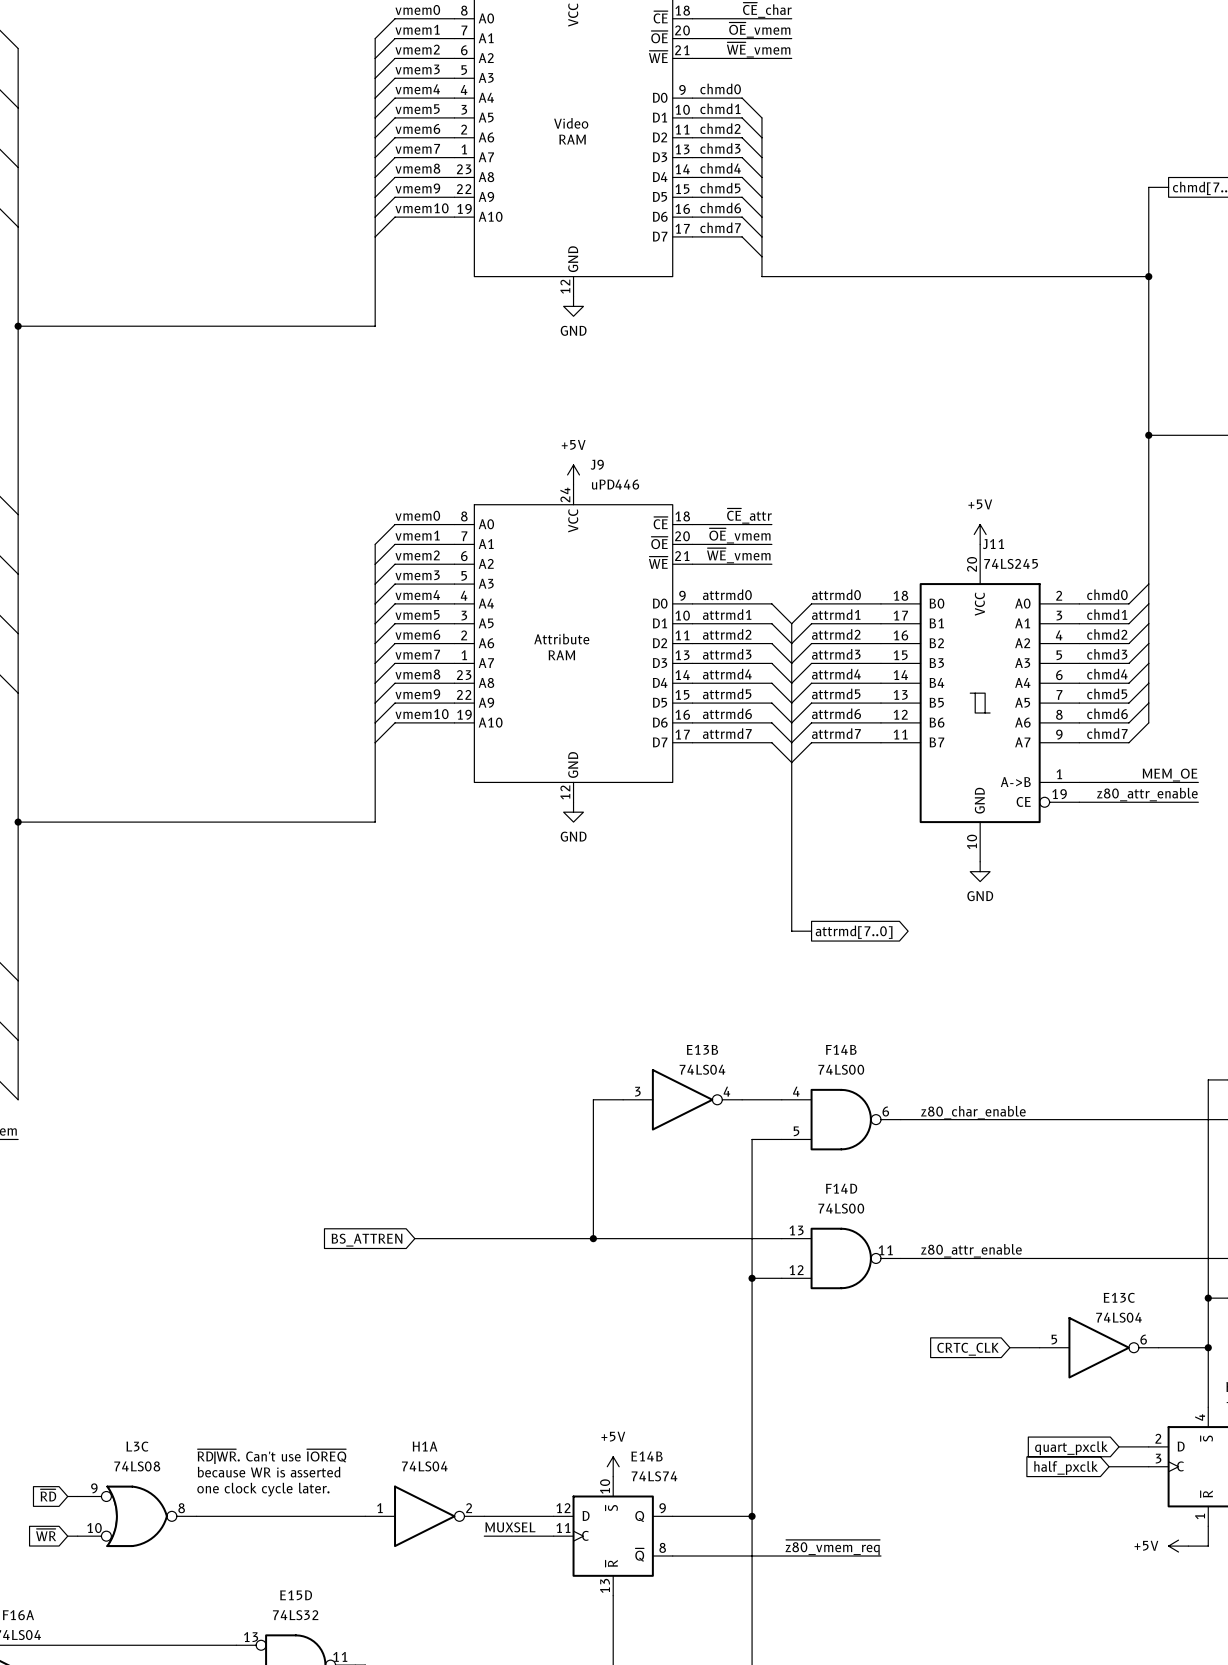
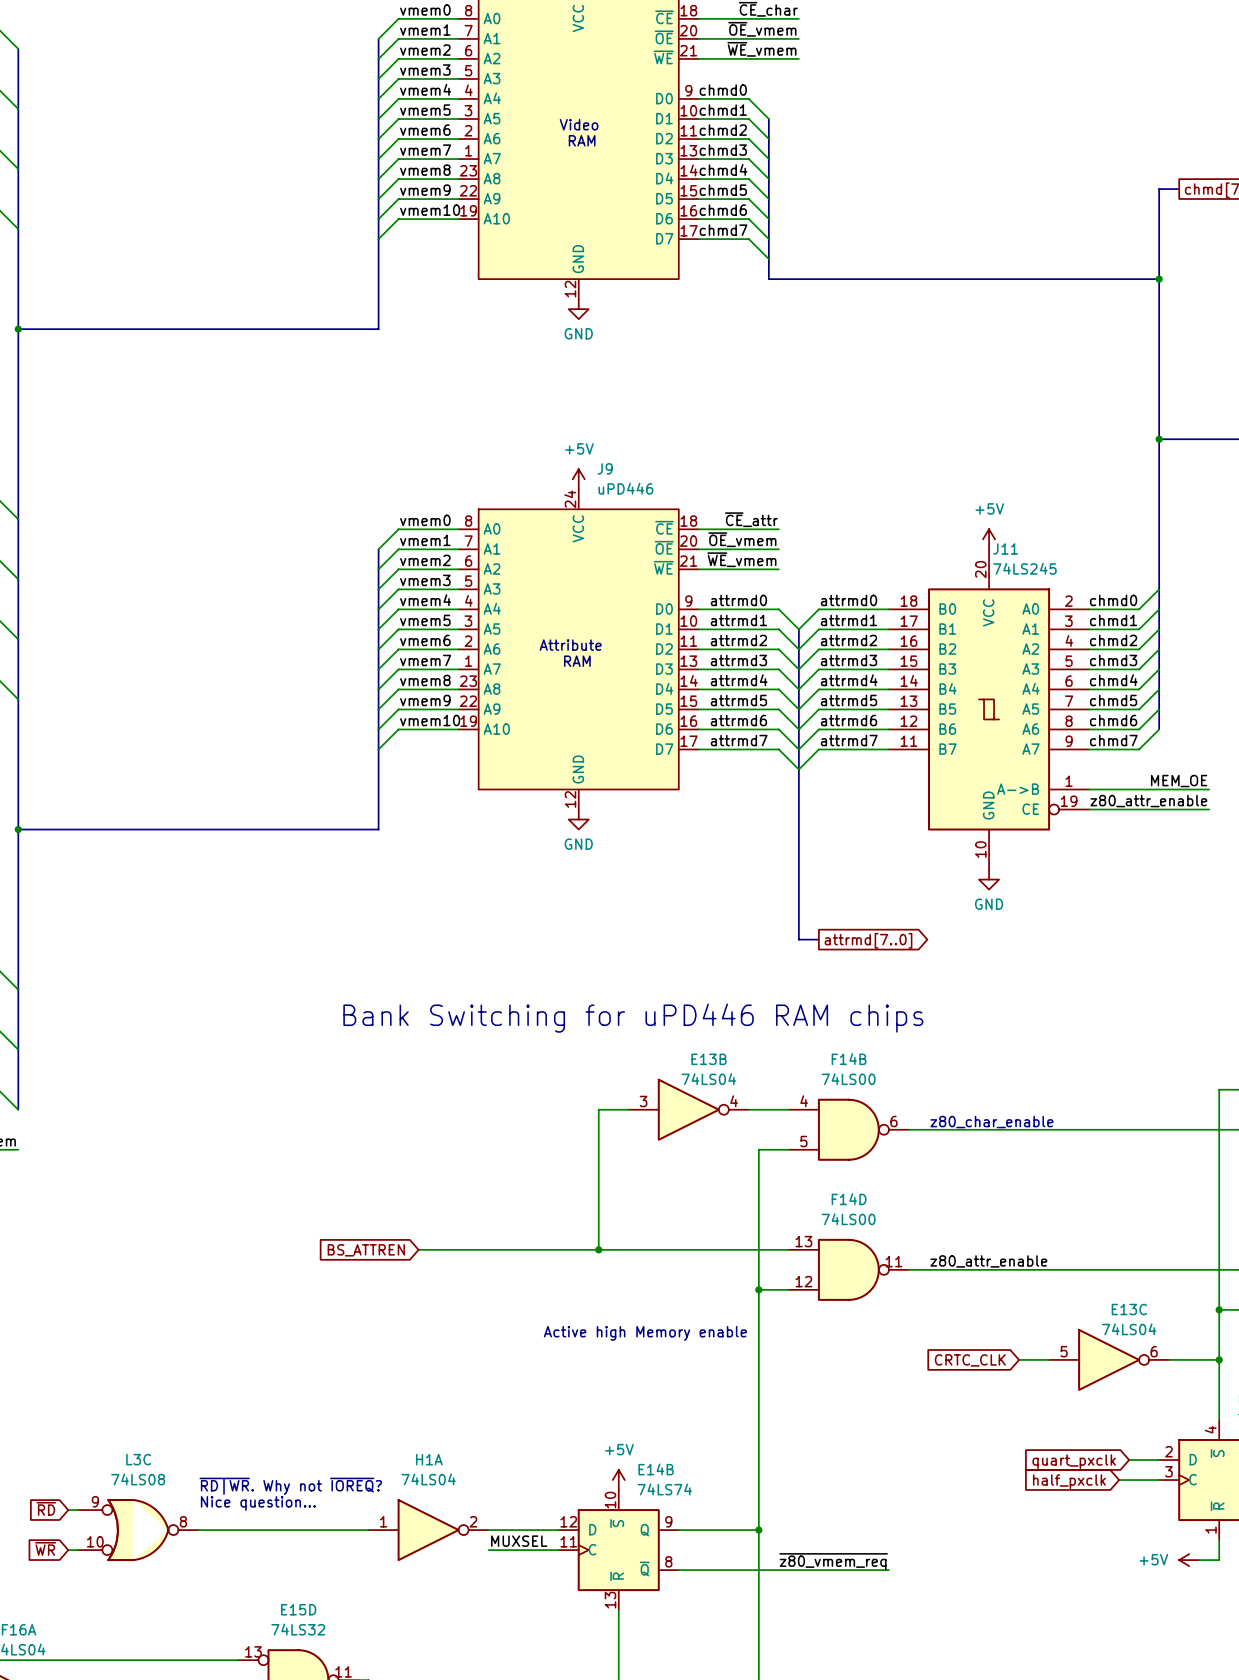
text: none -> Bank Switching for uPD446 RAM chips (633, 1018)
text: none -> Active high Memory enable (645, 1333)
text: ~{RD|WR}. Can't use ~{IOREQ} (271, 1456) -> none
text: because WR is asserted (269, 1472) -> ~{RD|WR}. Why not ~{IOREQ}? (290, 1486)
text: one clock cycle later. (263, 1489) -> Nice question... (258, 1503)

